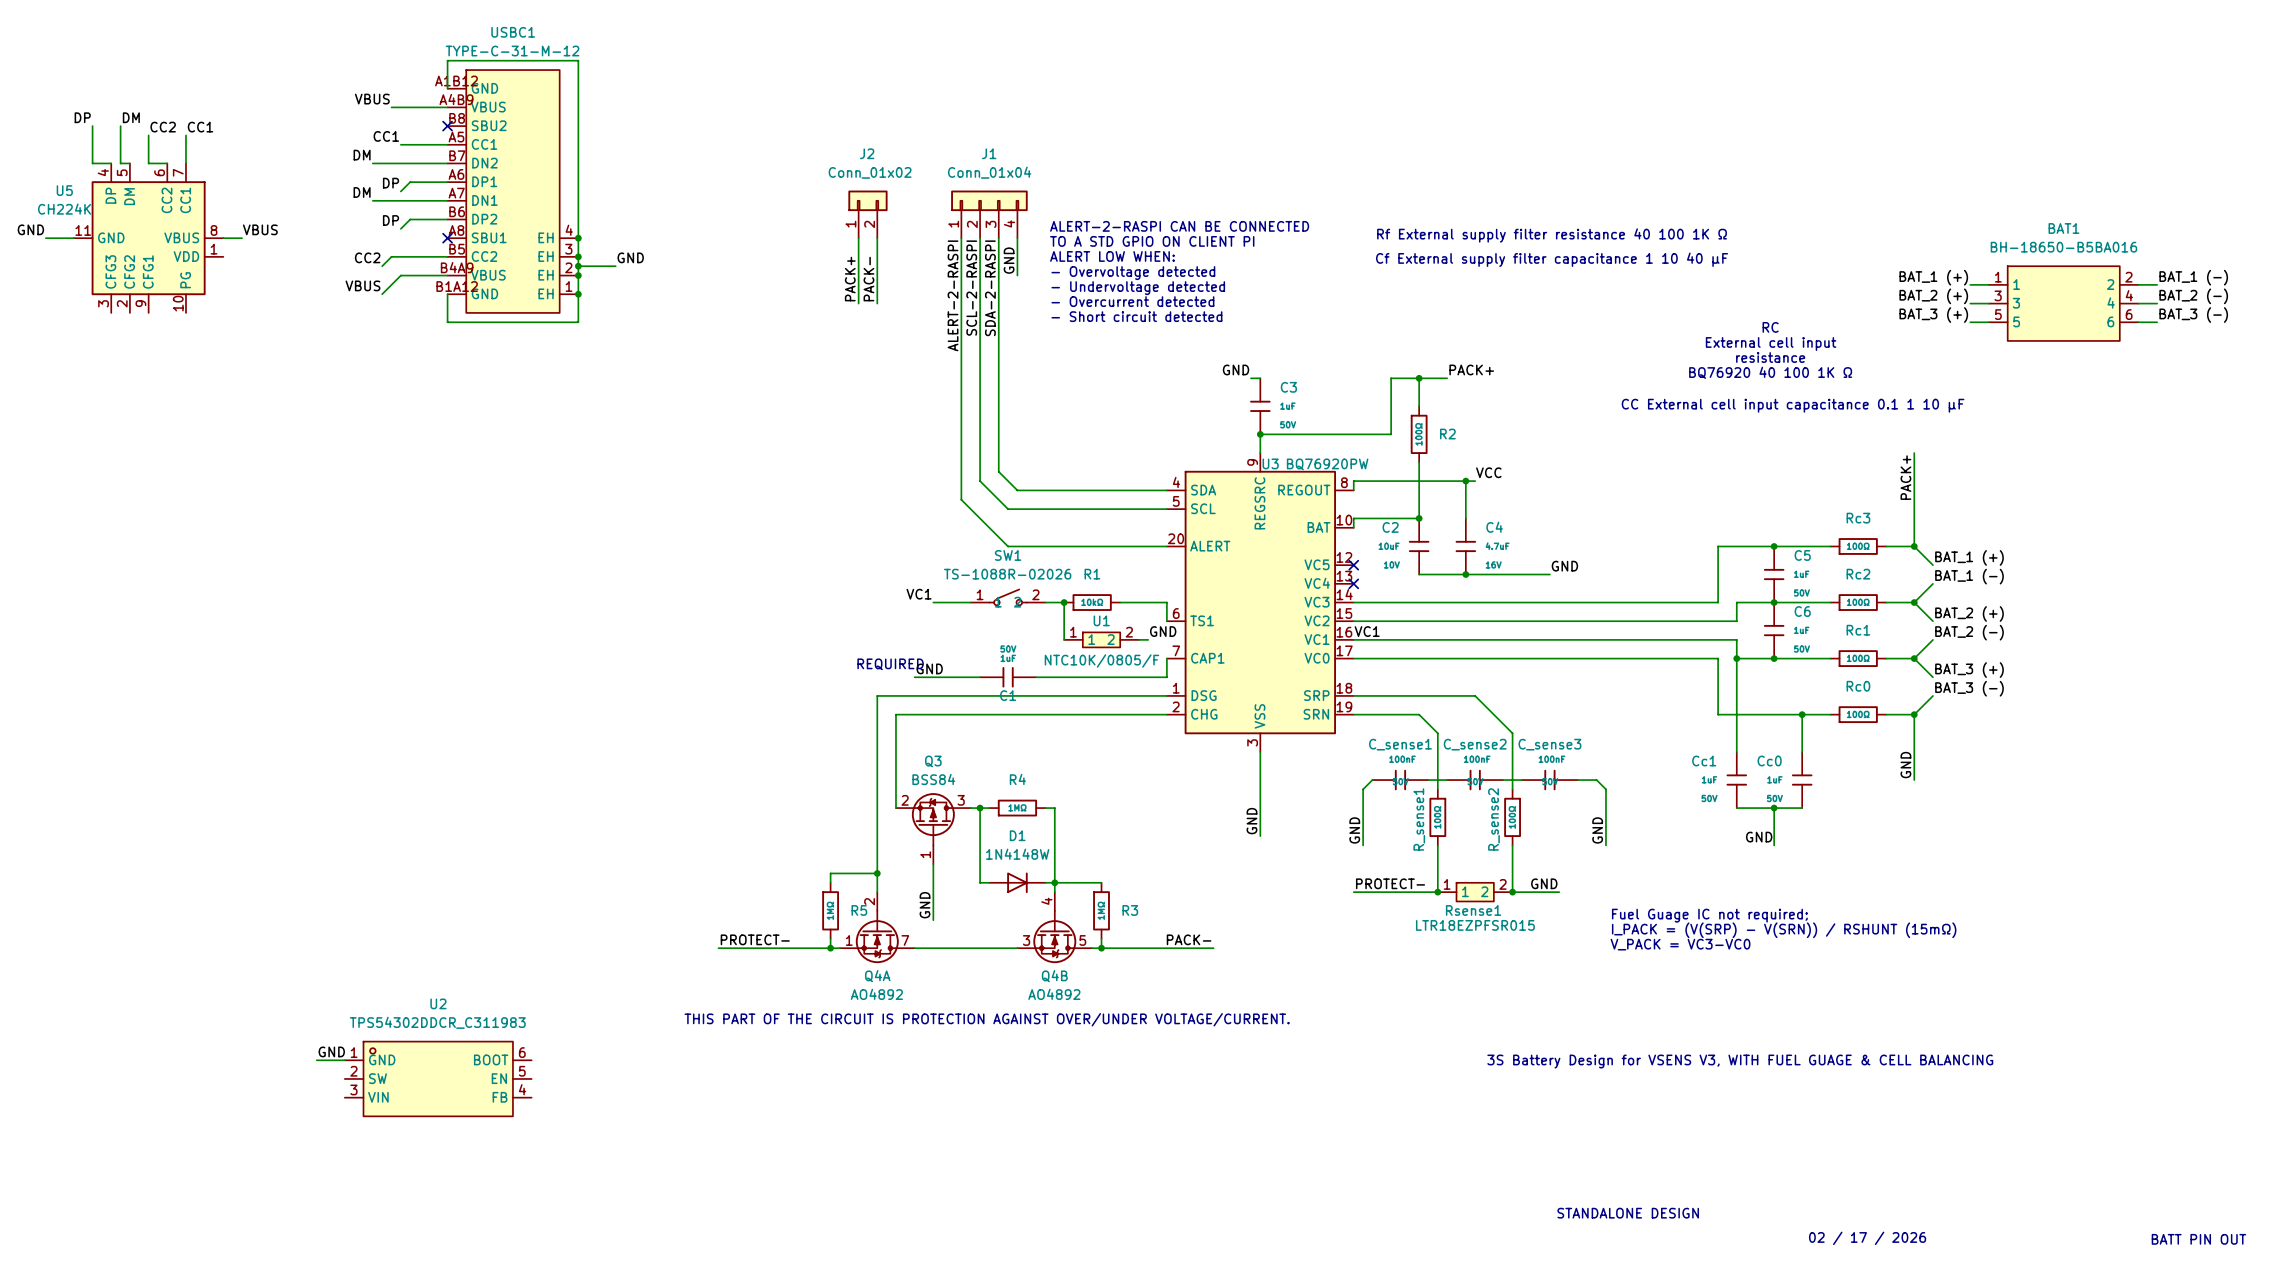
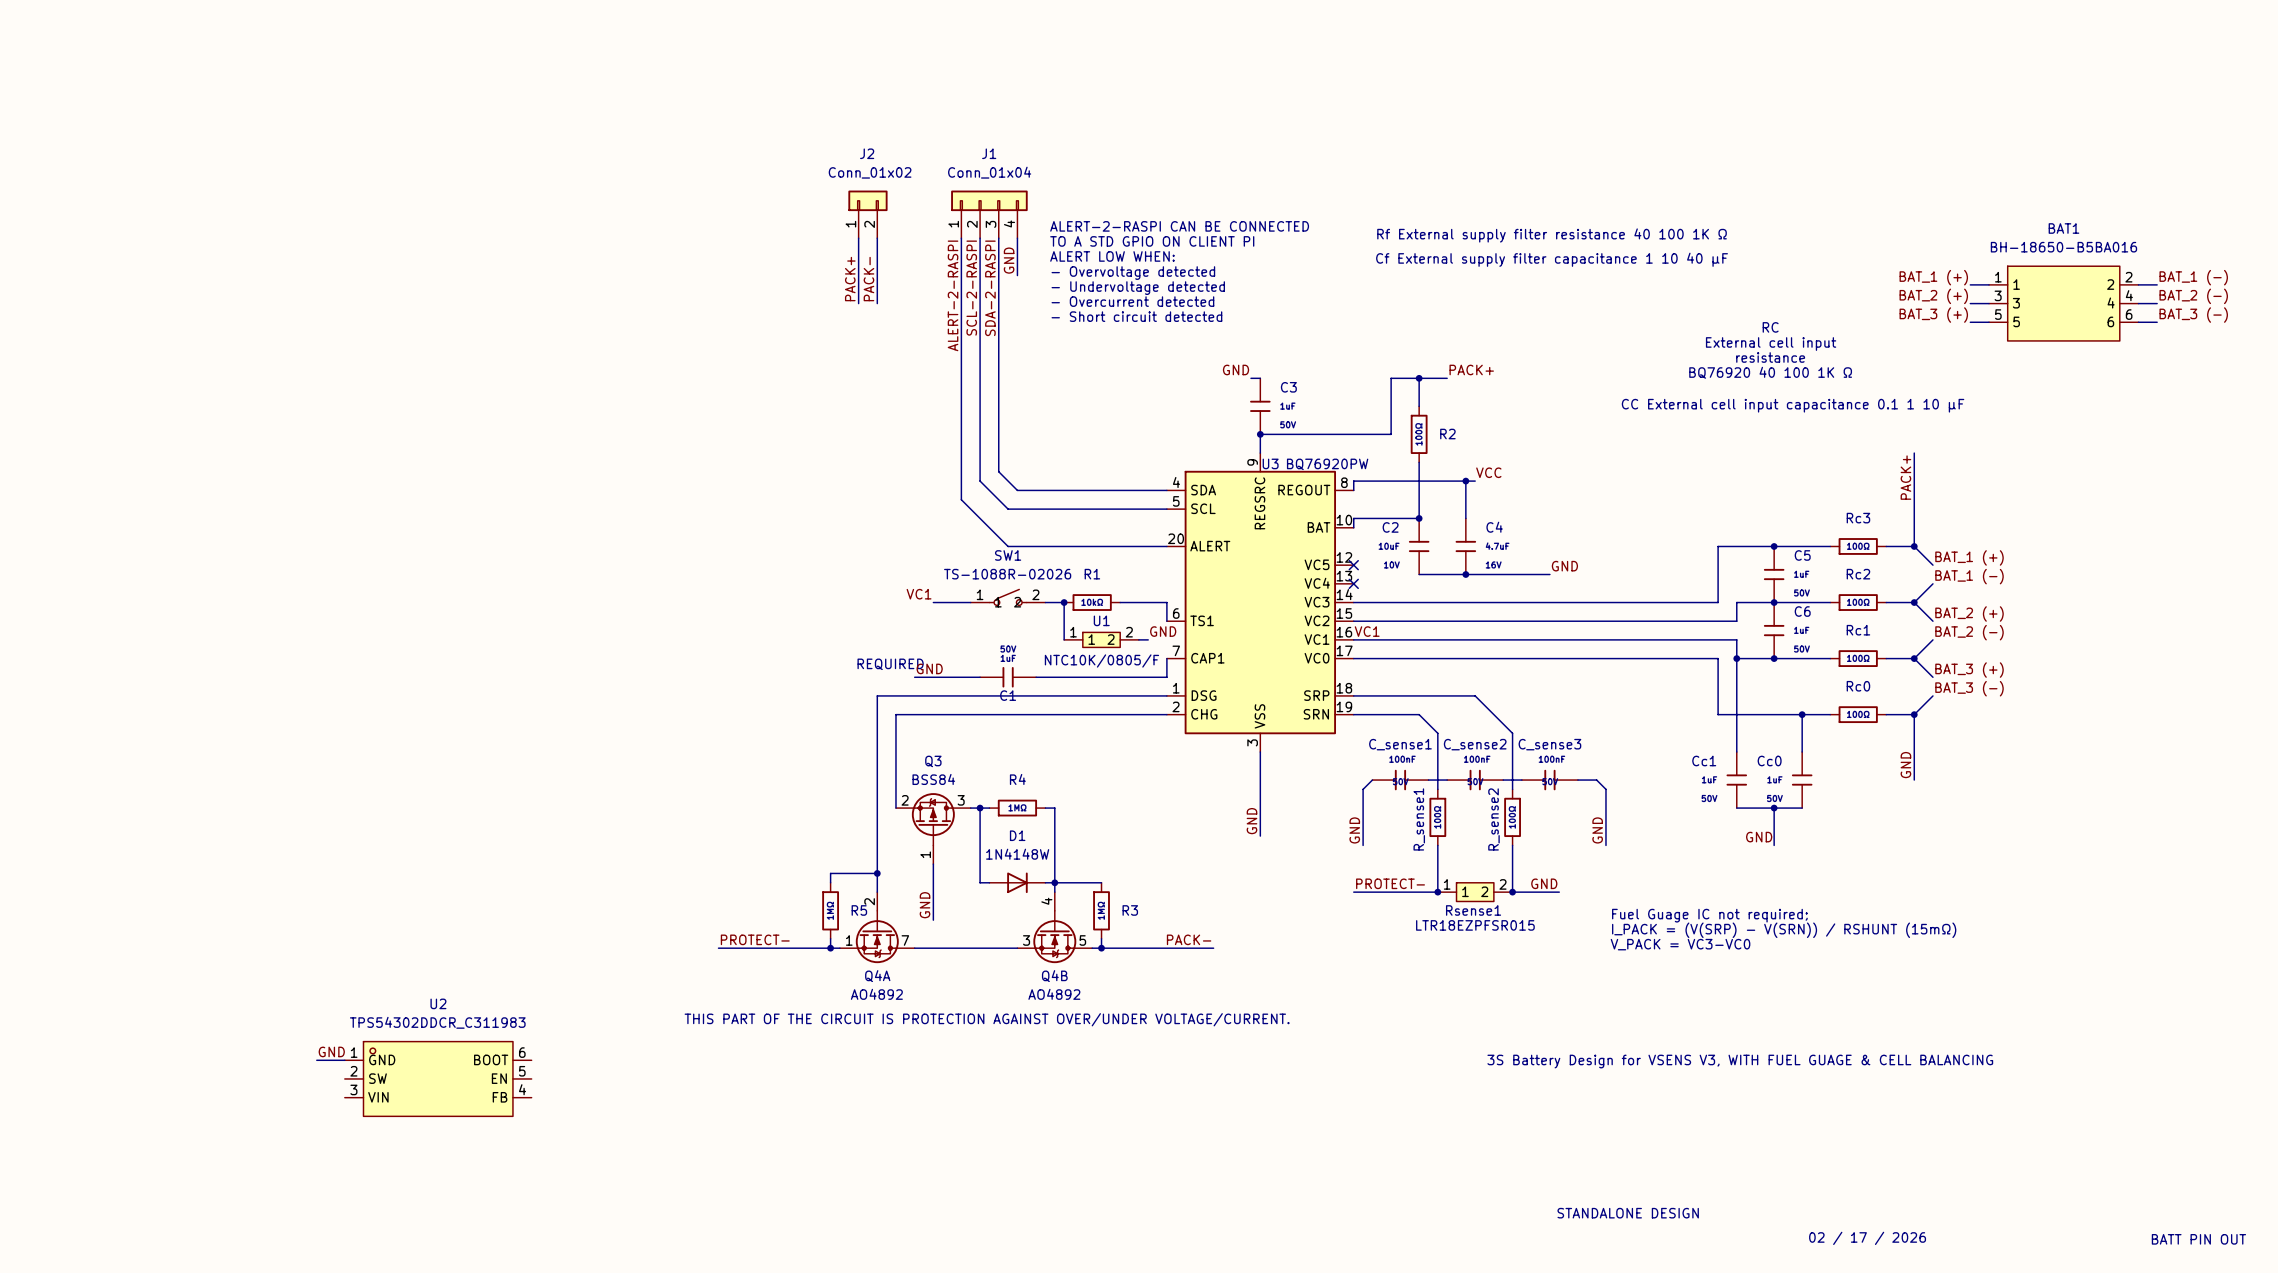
wire: (447, 88) (447, 60) (578, 60) (578, 322) (447, 322) (447, 294) -> none
label: VBUS (372, 99) -> none
wire: (391, 107) (447, 107) -> none
label: DP (82, 117) -> none
label: DM (131, 117) -> none
wire: (92, 126) (92, 163) (111, 163) -> none
wire: (120, 126) (120, 163) (129, 163) -> none
no-connect mark: (447, 126) -> none
label: CC2 (163, 127) -> none
label: CC1 (200, 127) -> none
wire: (148, 135) (148, 163) (167, 163) -> none
wire: (185, 135) (185, 163) -> none
label: CC1 (386, 136) -> none
wire: (400, 144) (447, 144) -> none
label: DM (362, 155) -> none
wire: (372, 163) (447, 163) -> none
wire: (447, 182) (410, 182) (400, 191) -> none
label: DP (391, 183) -> none
USBC1: TYPE-C-31-M-12 (512, 191) -> none
label: DM (362, 192) -> none
wire: (372, 200) (447, 200) -> none
wire: (447, 219) (410, 219) (400, 228) -> none
label: DP (391, 220) -> none
label: GND (30, 229) -> none
label: VBUS (260, 229) -> none
wire: (45, 238) (73, 238) -> none
U5: CH224K (148, 238) -> none
wire: (223, 238) (242, 238) -> none
no-connect mark: (447, 238) -> none
junction: (578, 238) -> none
wire: (447, 256) (391, 256) (382, 266) -> none
junction: (578, 256) -> none
label: CC2 (367, 257) -> none
label: GND (630, 257) -> none
wire: (578, 266) (615, 266) -> none
junction: (578, 266) -> none
wire: (447, 275) (400, 275) (382, 294) -> none
junction: (578, 275) -> none
label: VBUS (362, 285) -> none
junction: (578, 294) -> none

